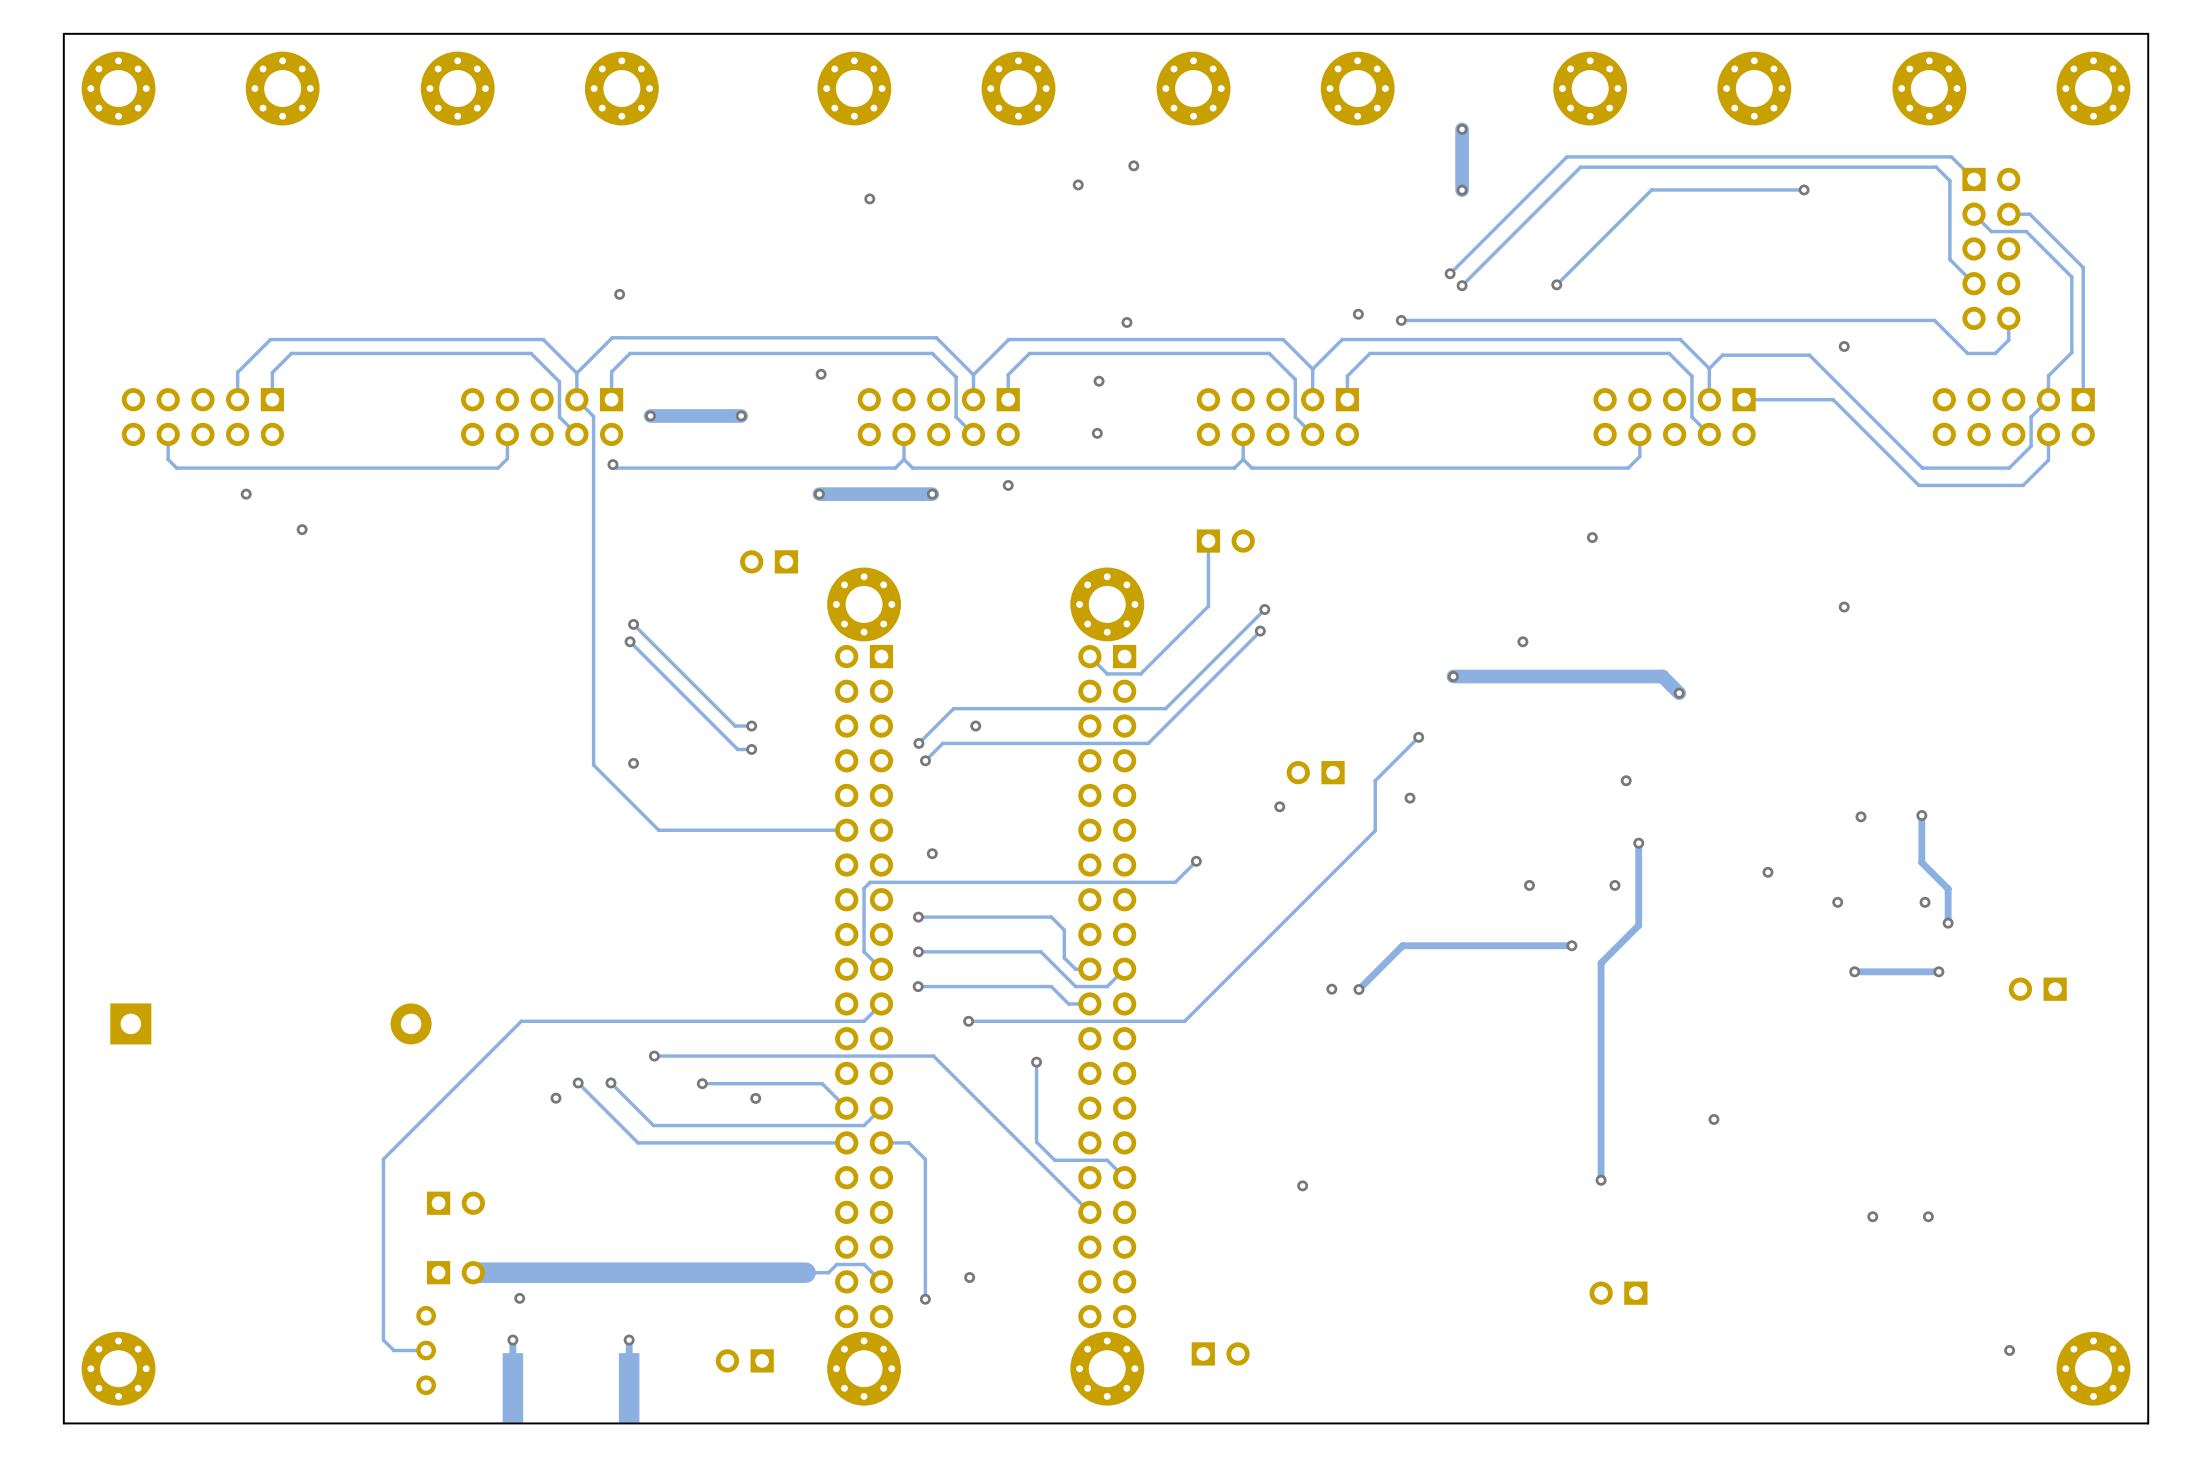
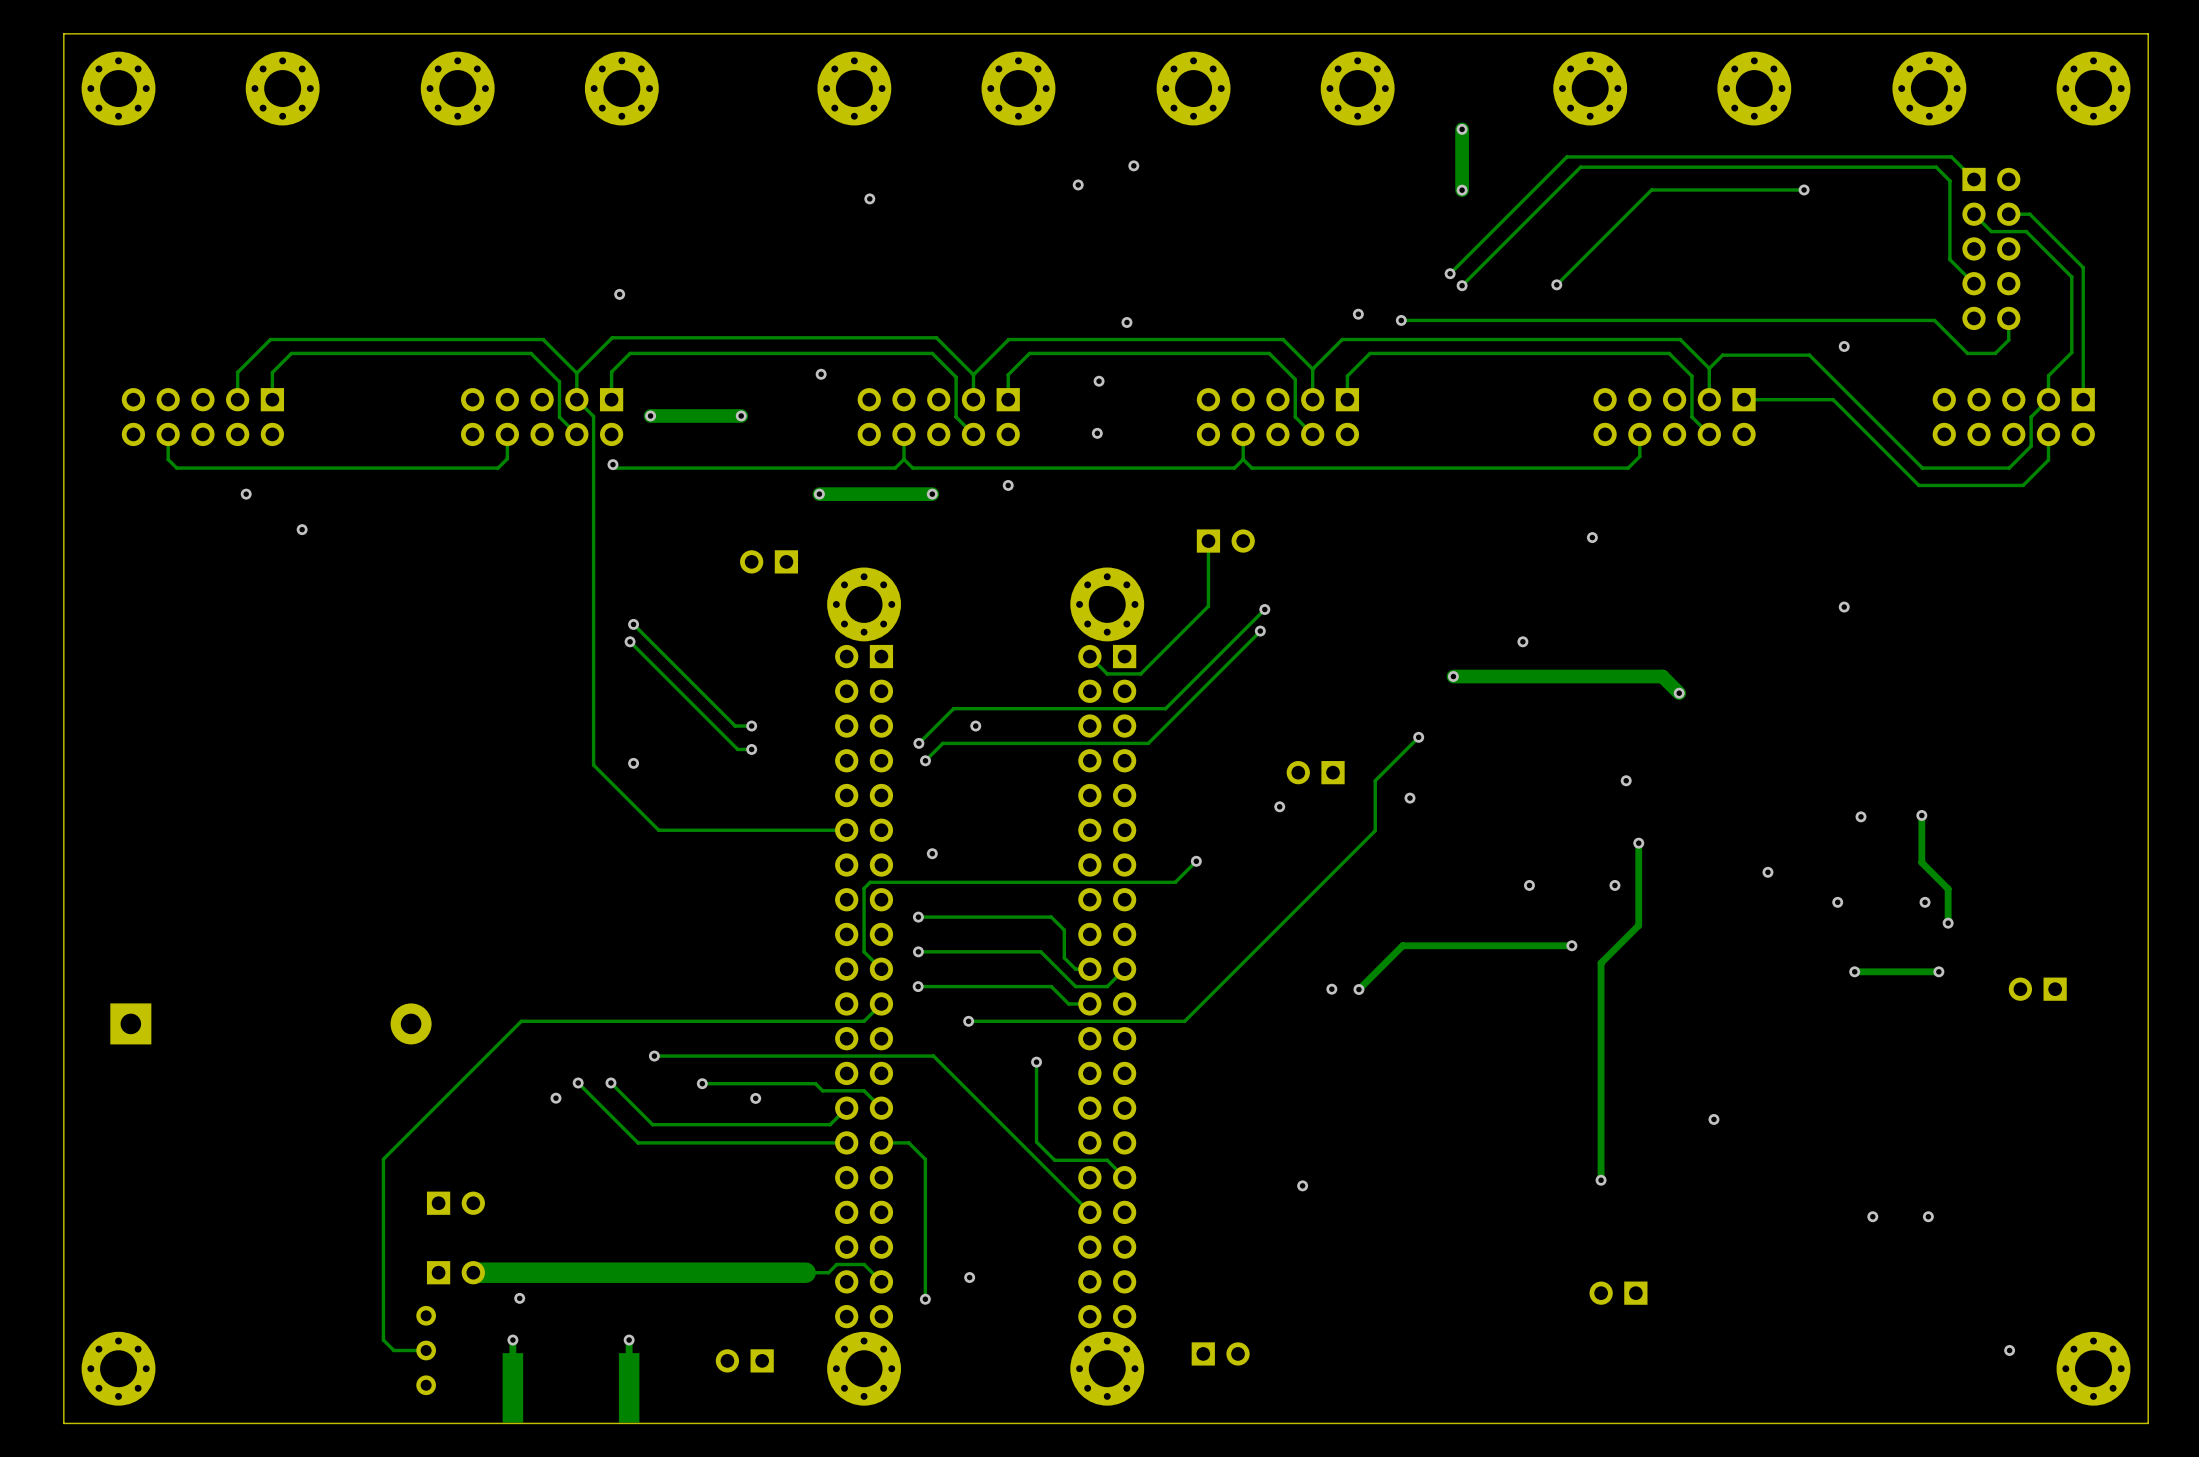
track: (815, 1083) (822, 1083) (846, 1108) -> (815, 1083) (822, 1090) (864, 1090) (881, 1108)
track: (881, 1108) (864, 1125) (652, 1124) -> (846, 1108) (830, 1124) (652, 1124)

